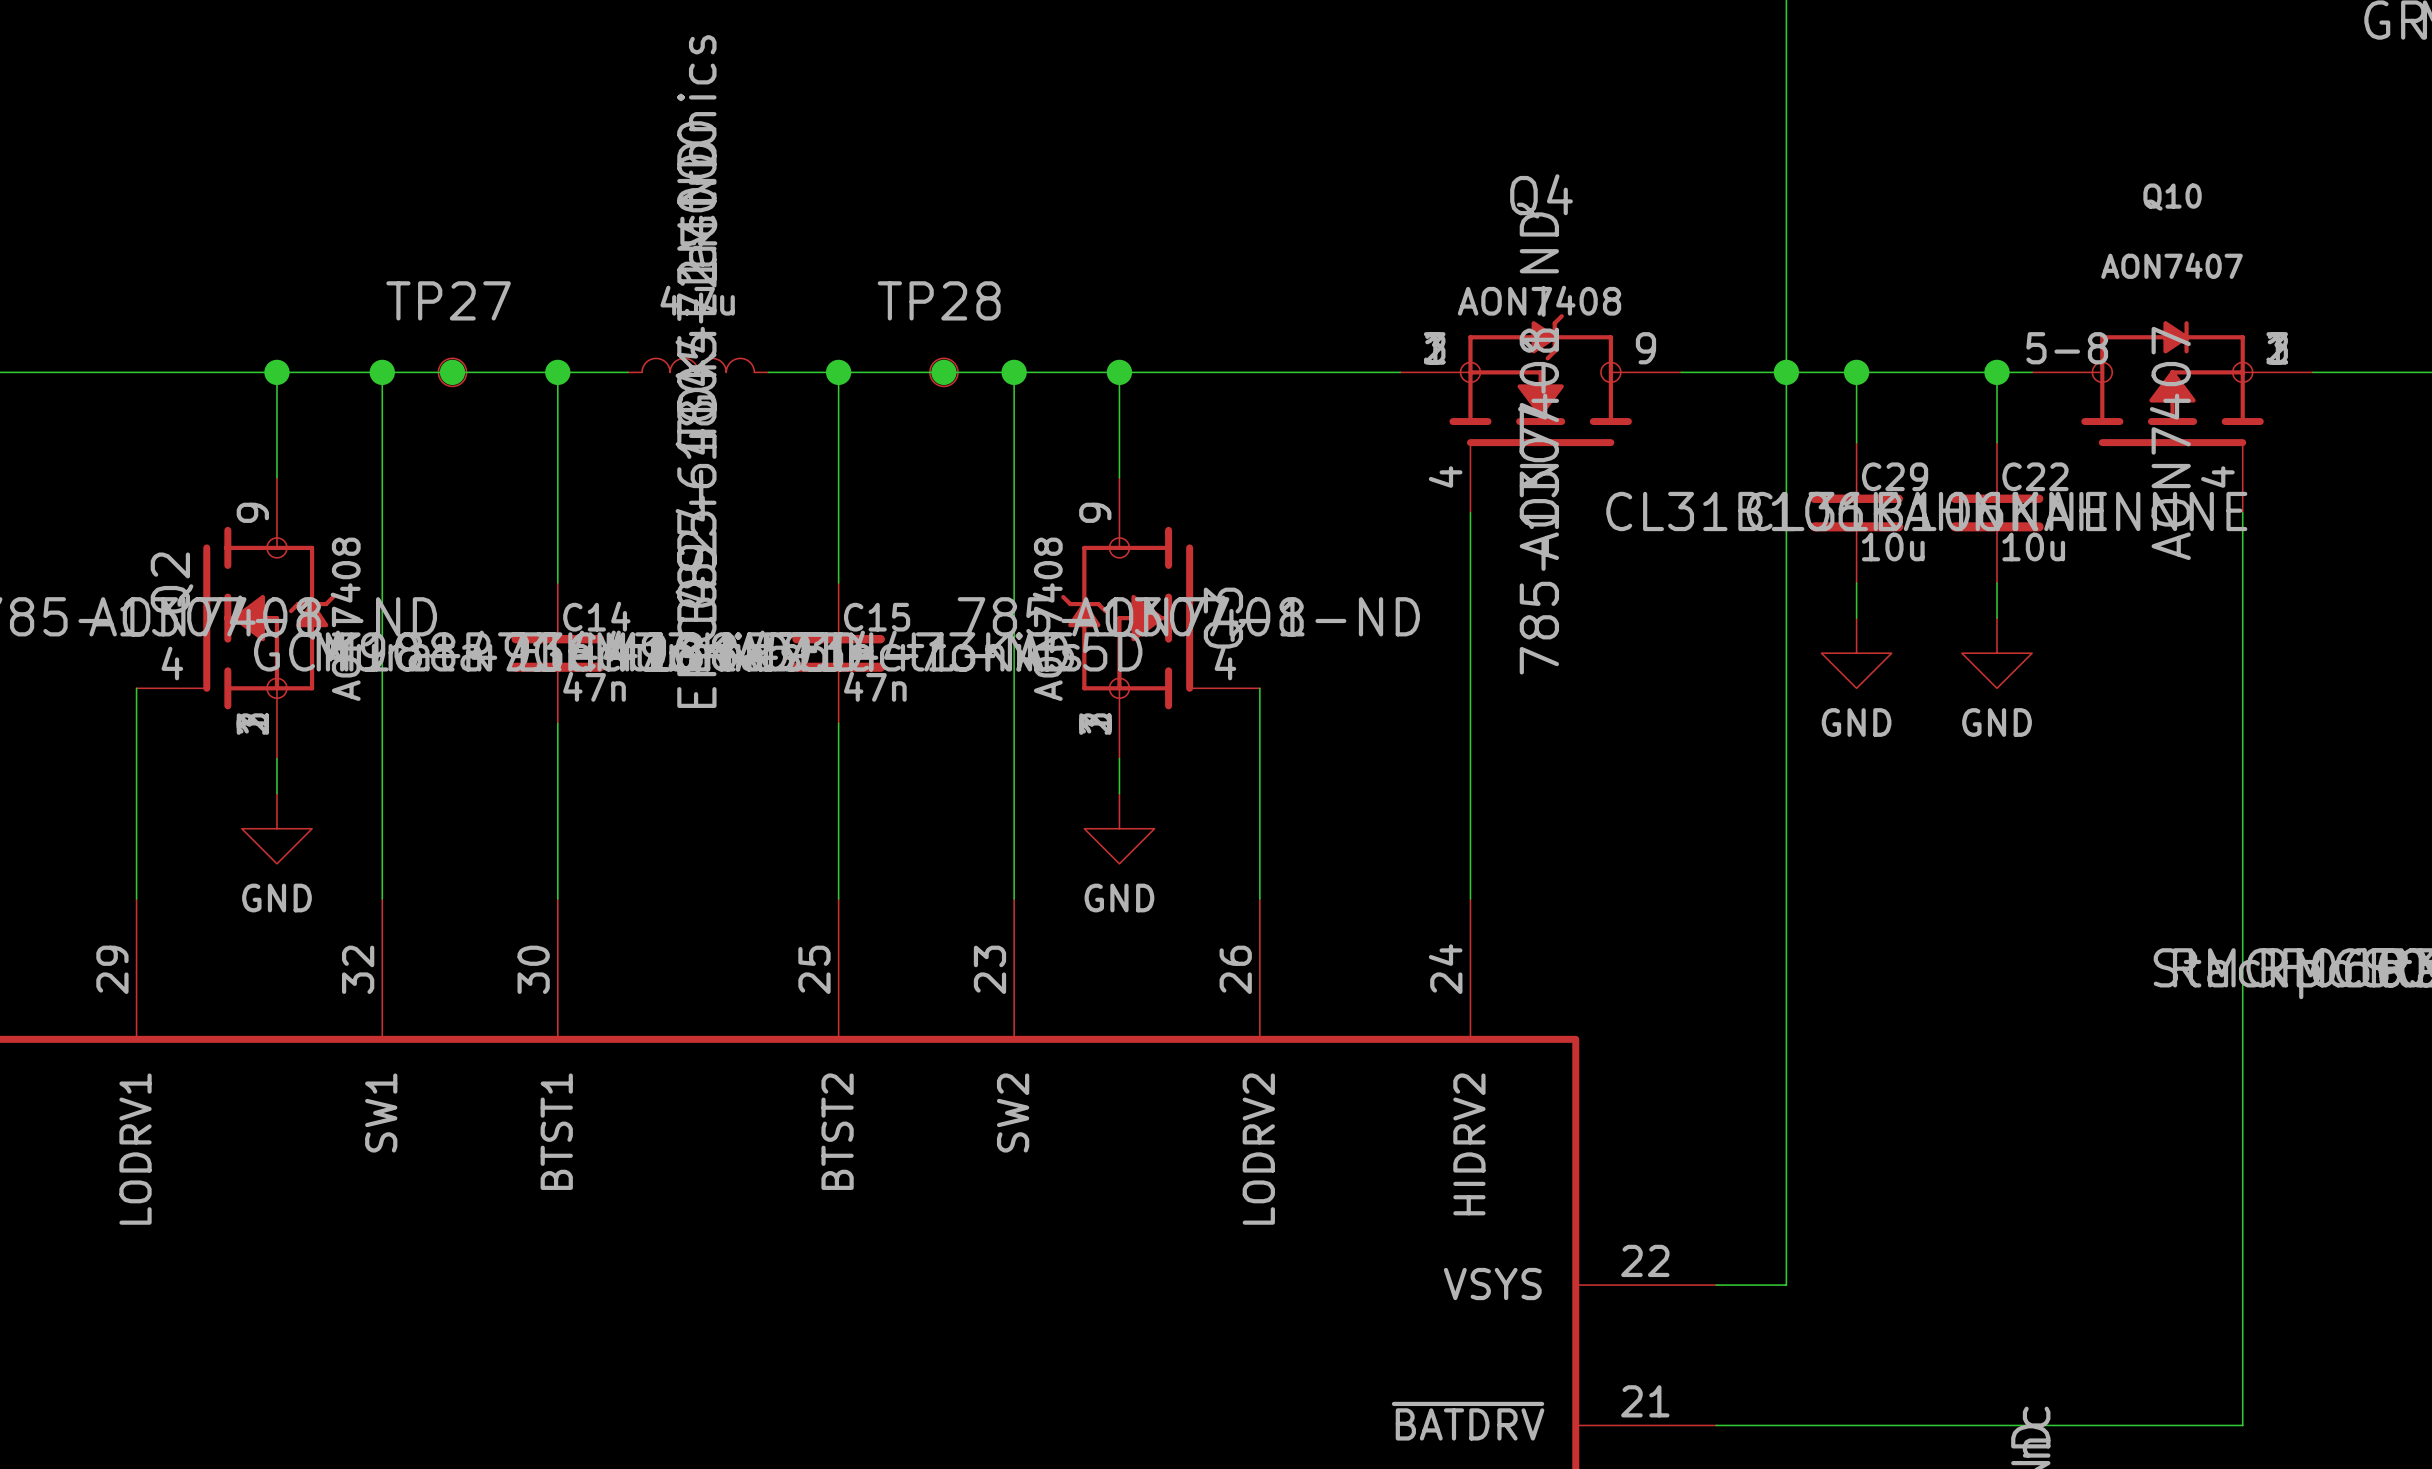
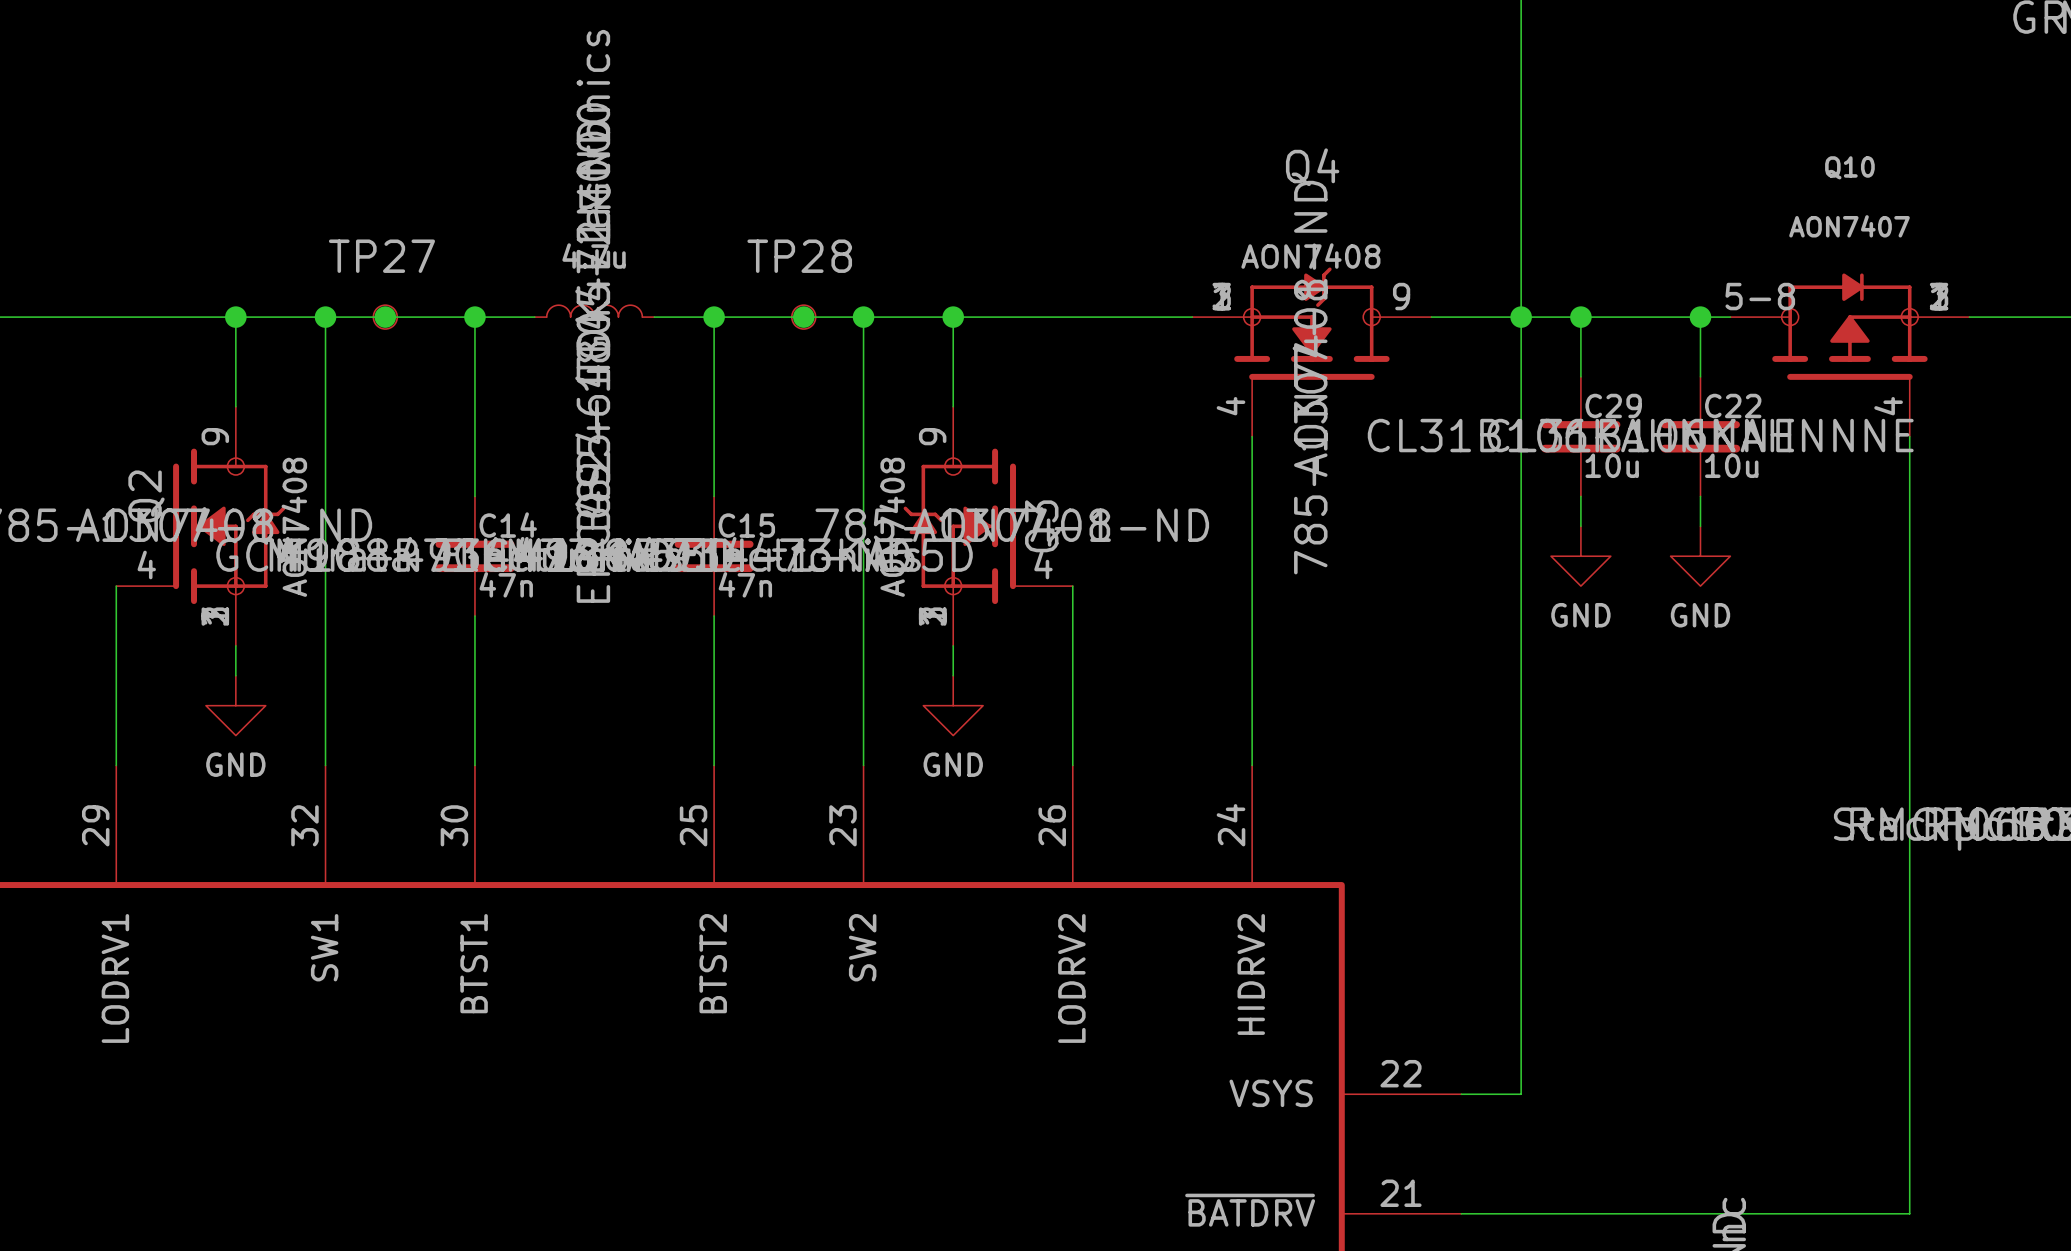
Q10 text: AON7407 (2170, 443) -> none

